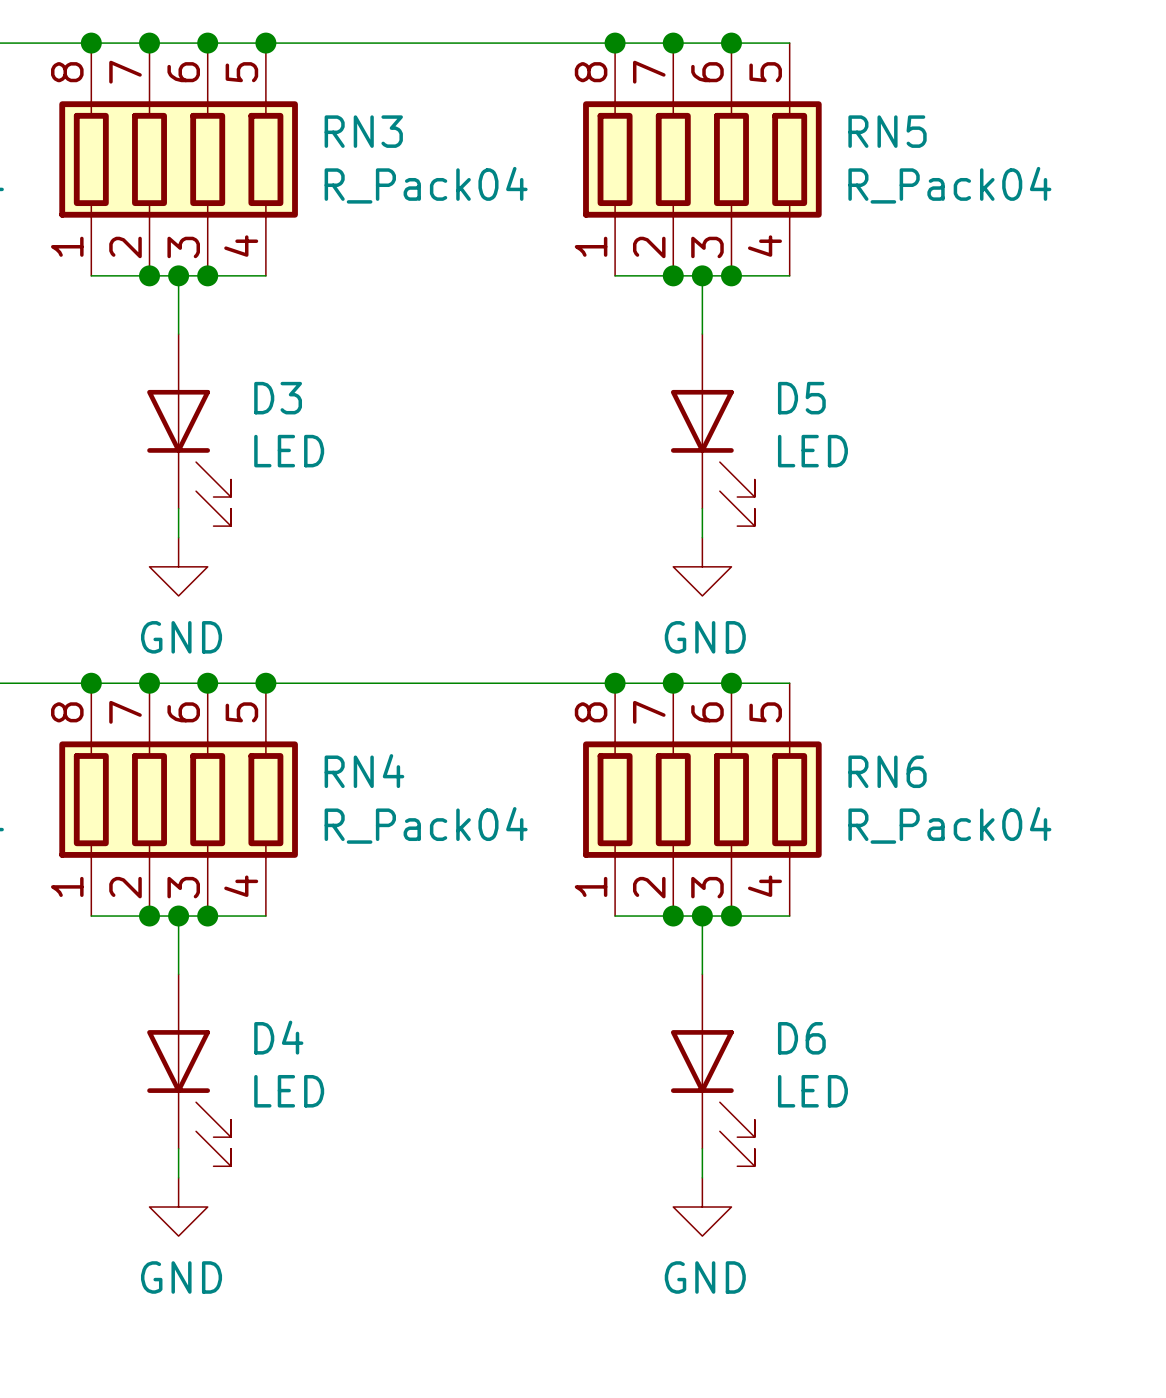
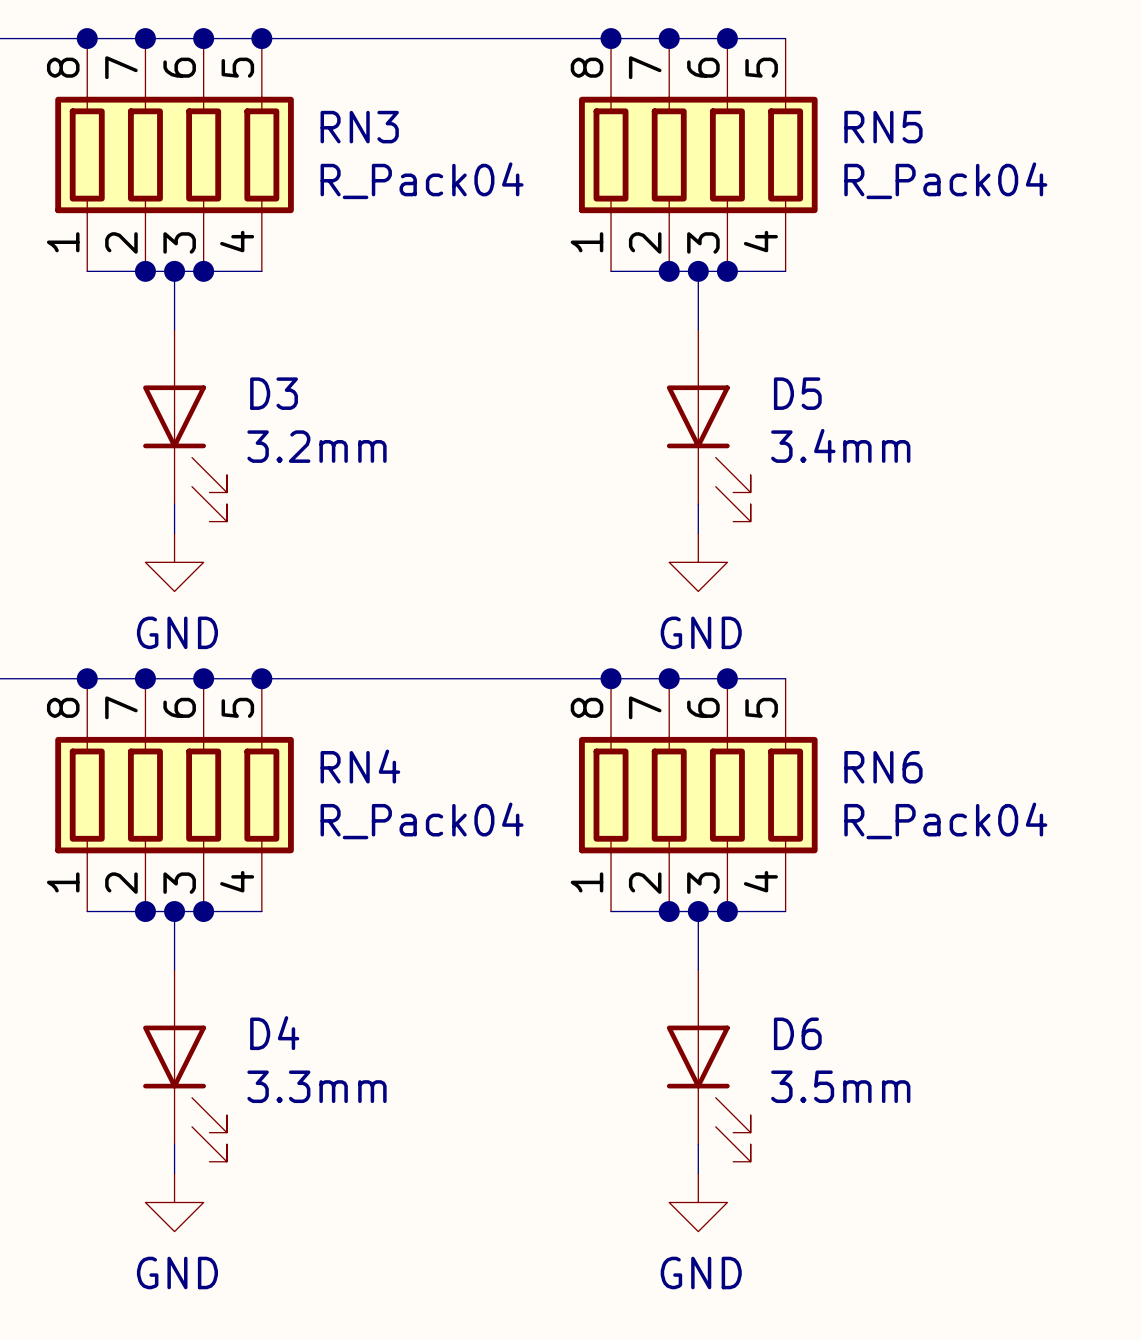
D3 value: LED (289, 451) -> 3.2mm (316, 446)
D5 value: LED (812, 451) -> 3.4mm (840, 445)
D4 value: LED (289, 1091) -> 3.3mm (316, 1086)
D6 value: LED (812, 1091) -> 3.5mm (840, 1086)

